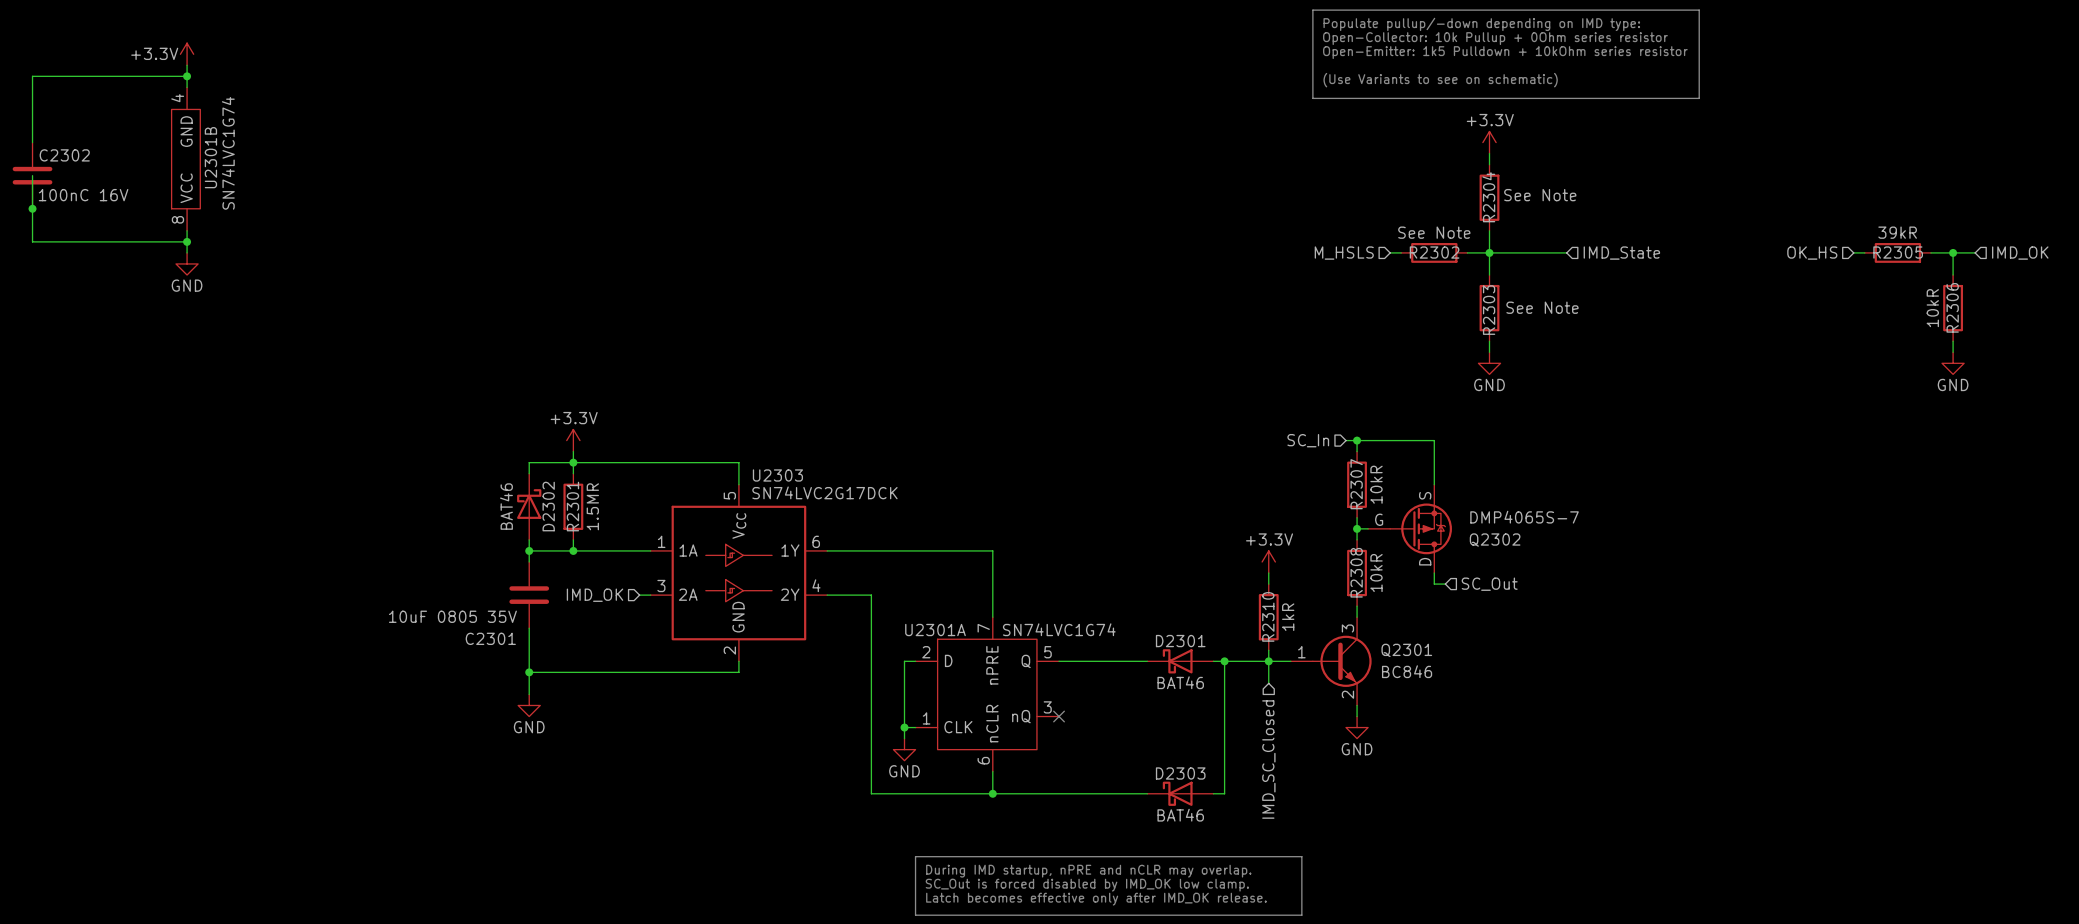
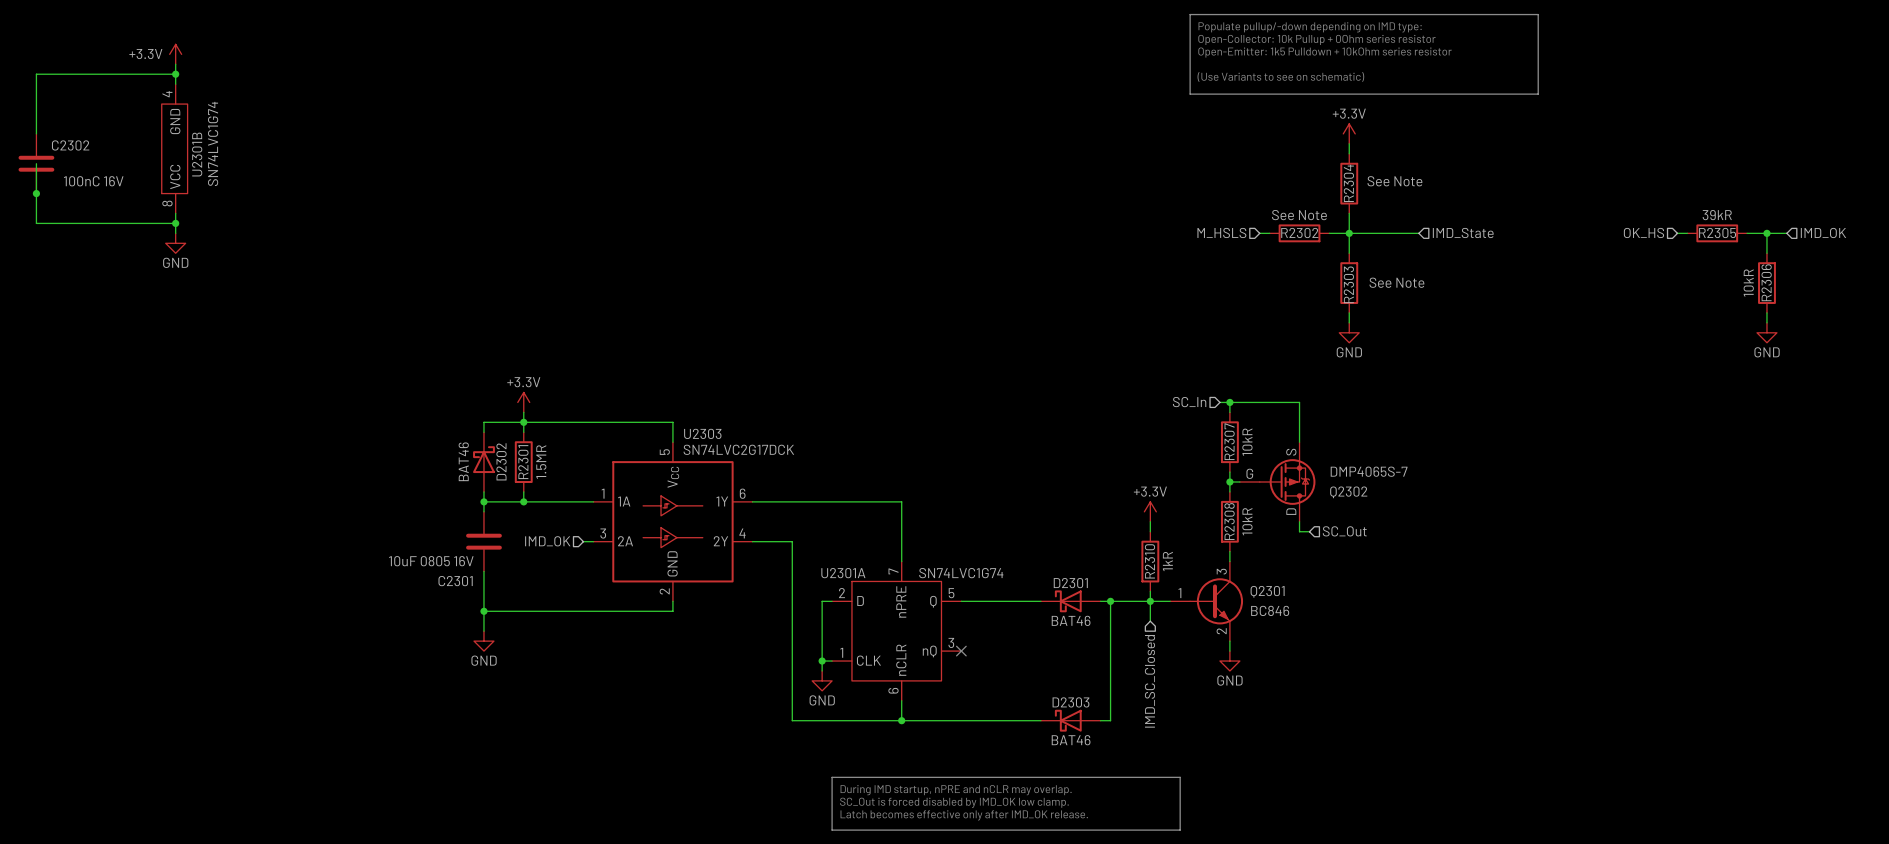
C2301 value: 10uF 0805 35V (452, 616) -> 10uF 0805 16V (431, 561)

